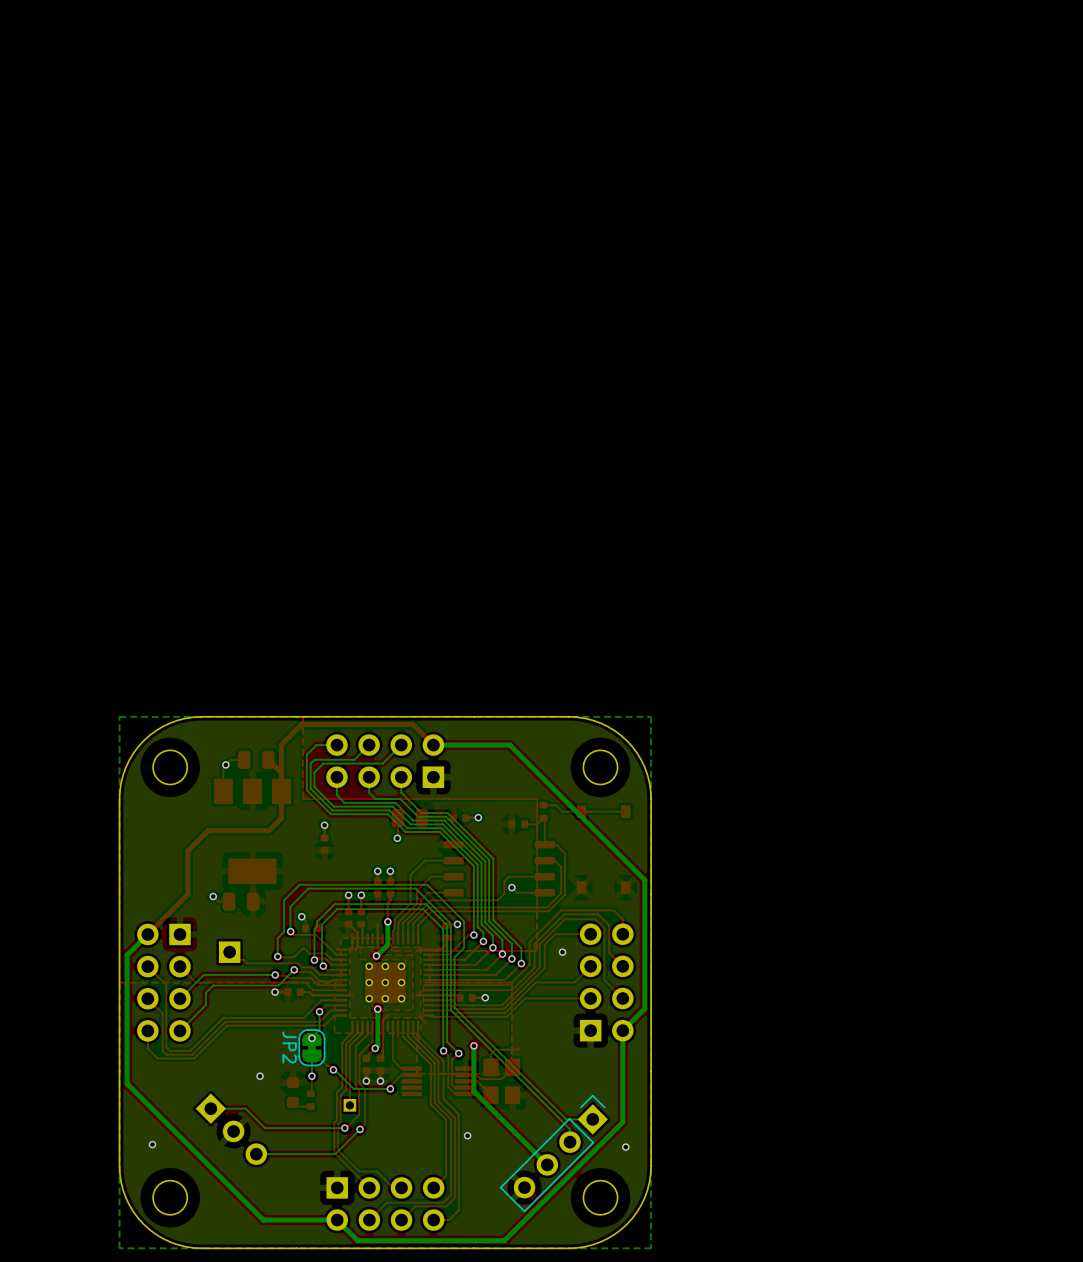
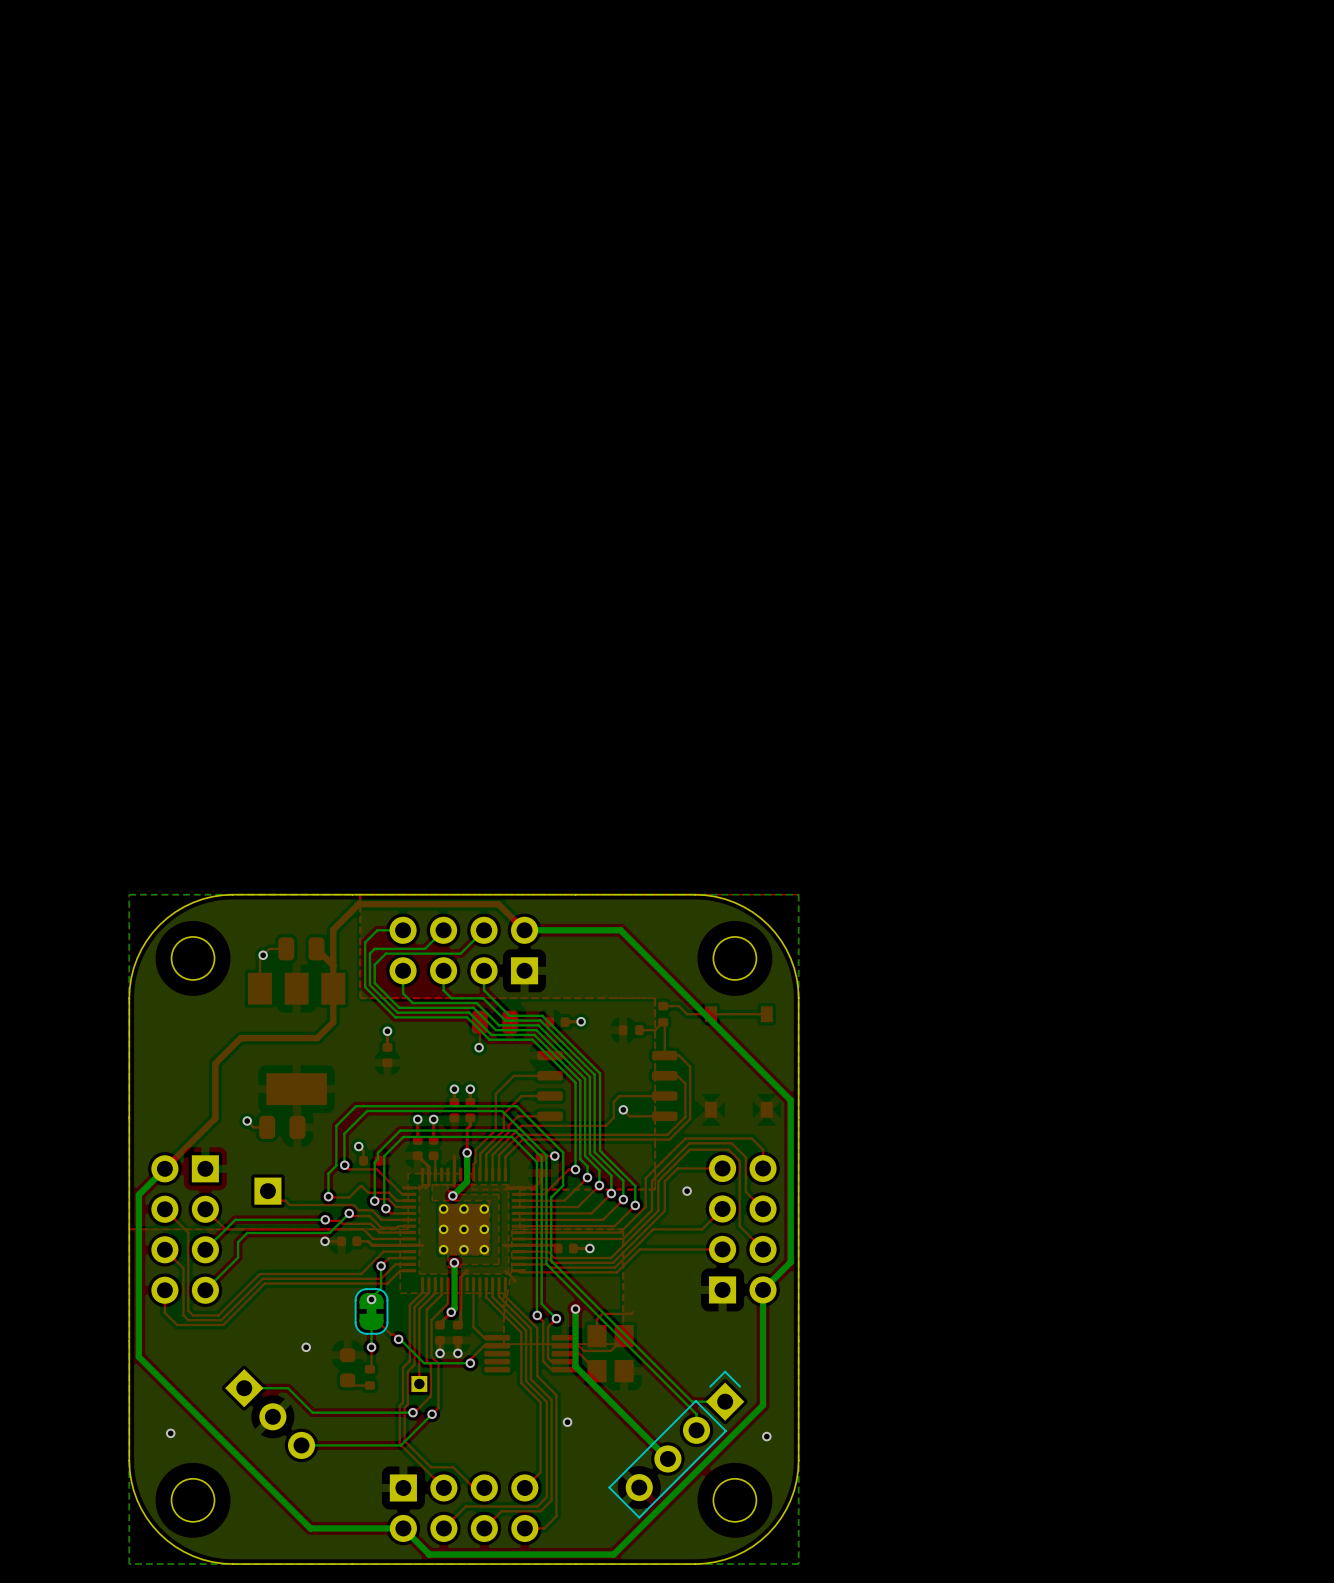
JP2 name: JP2 (289, 1047) -> none

